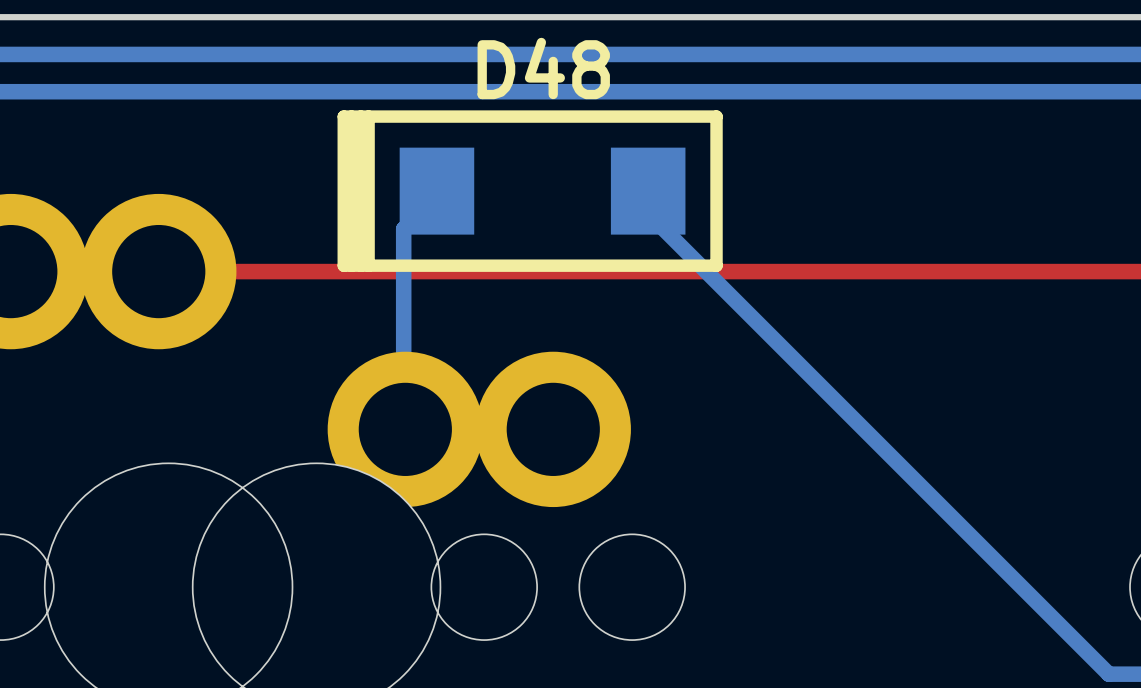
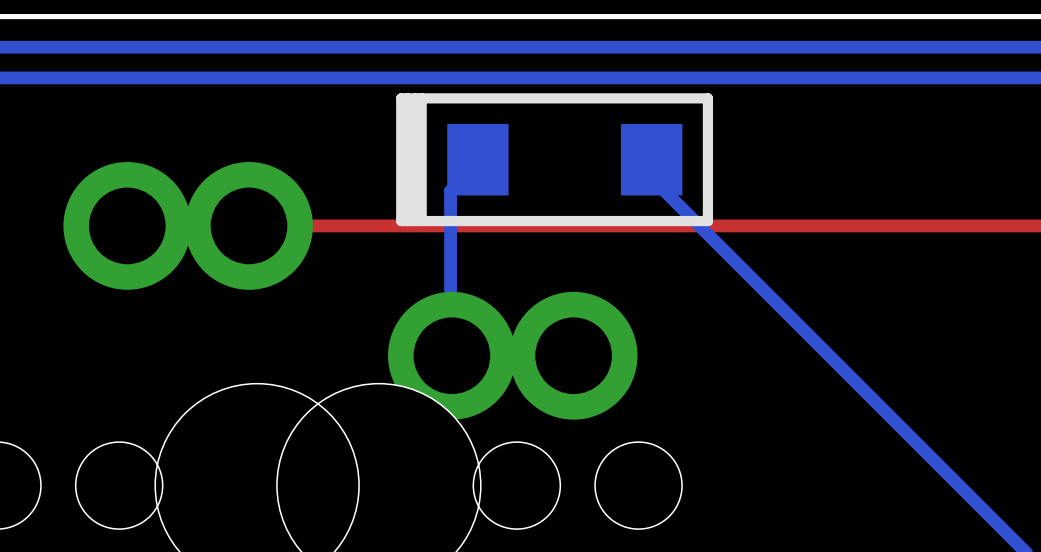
part value: D48 (543, 68) -> none

